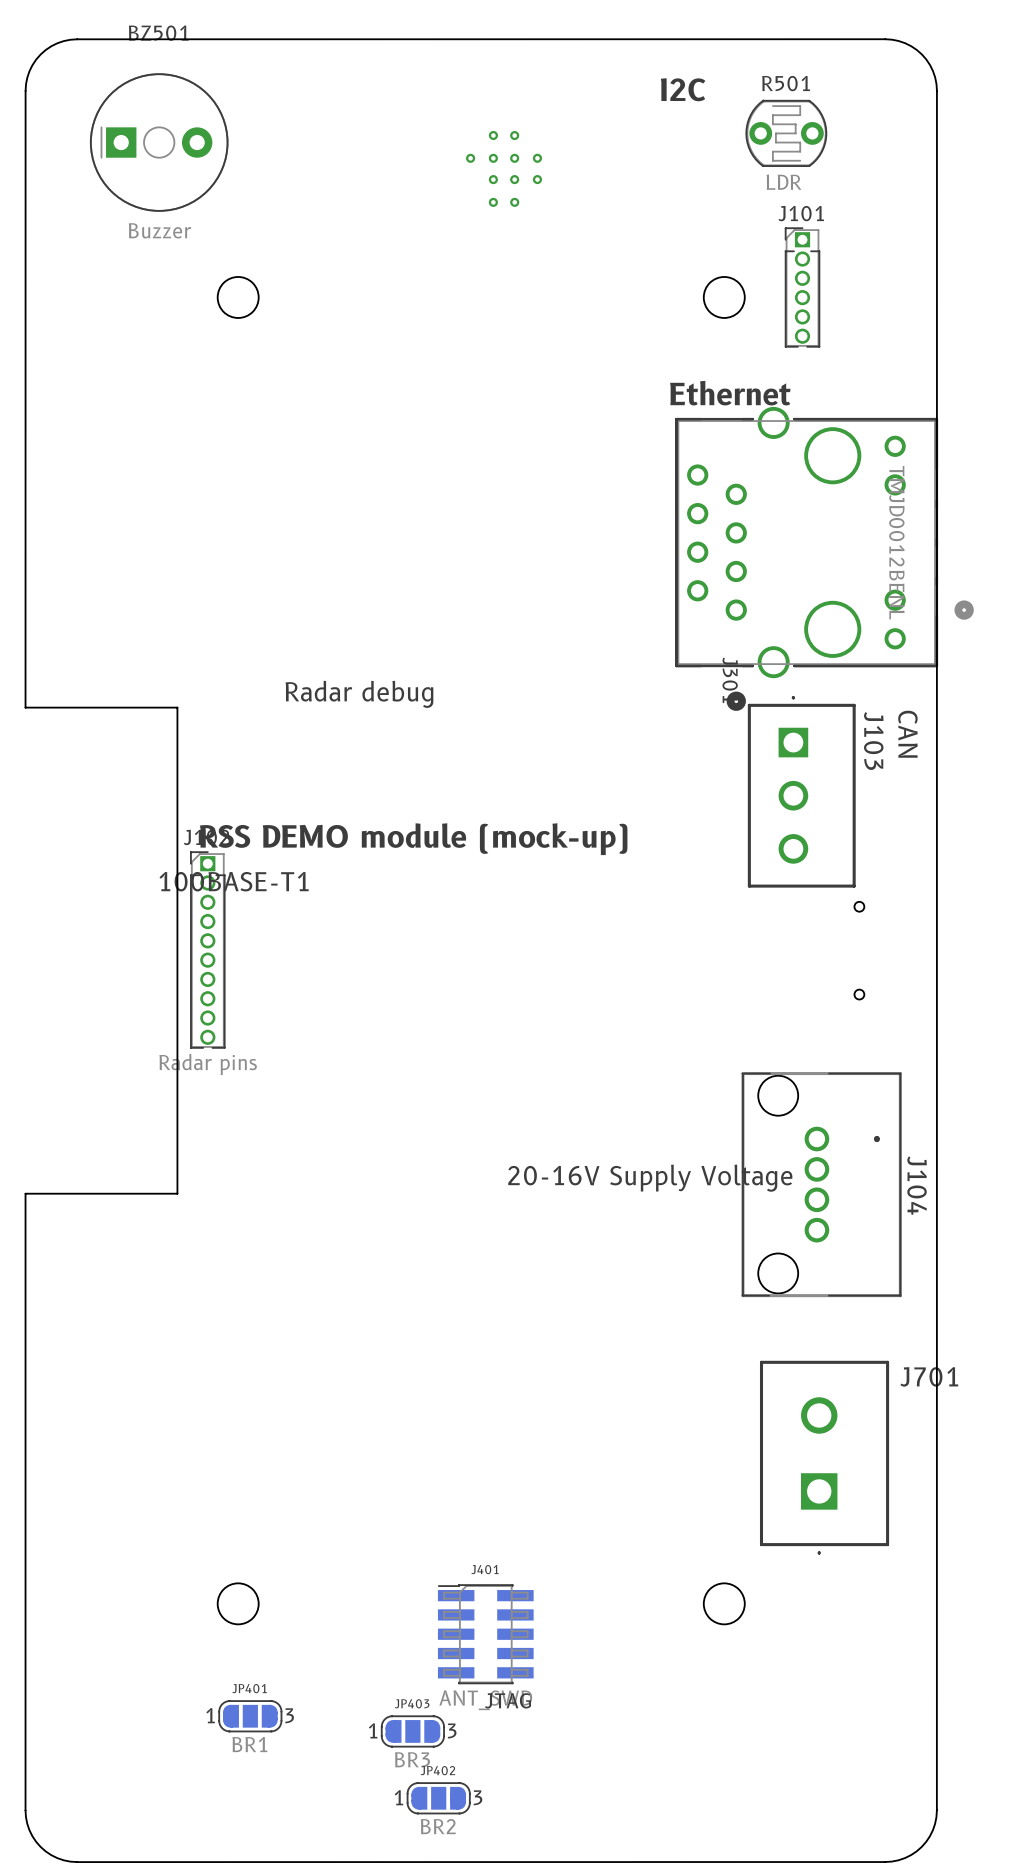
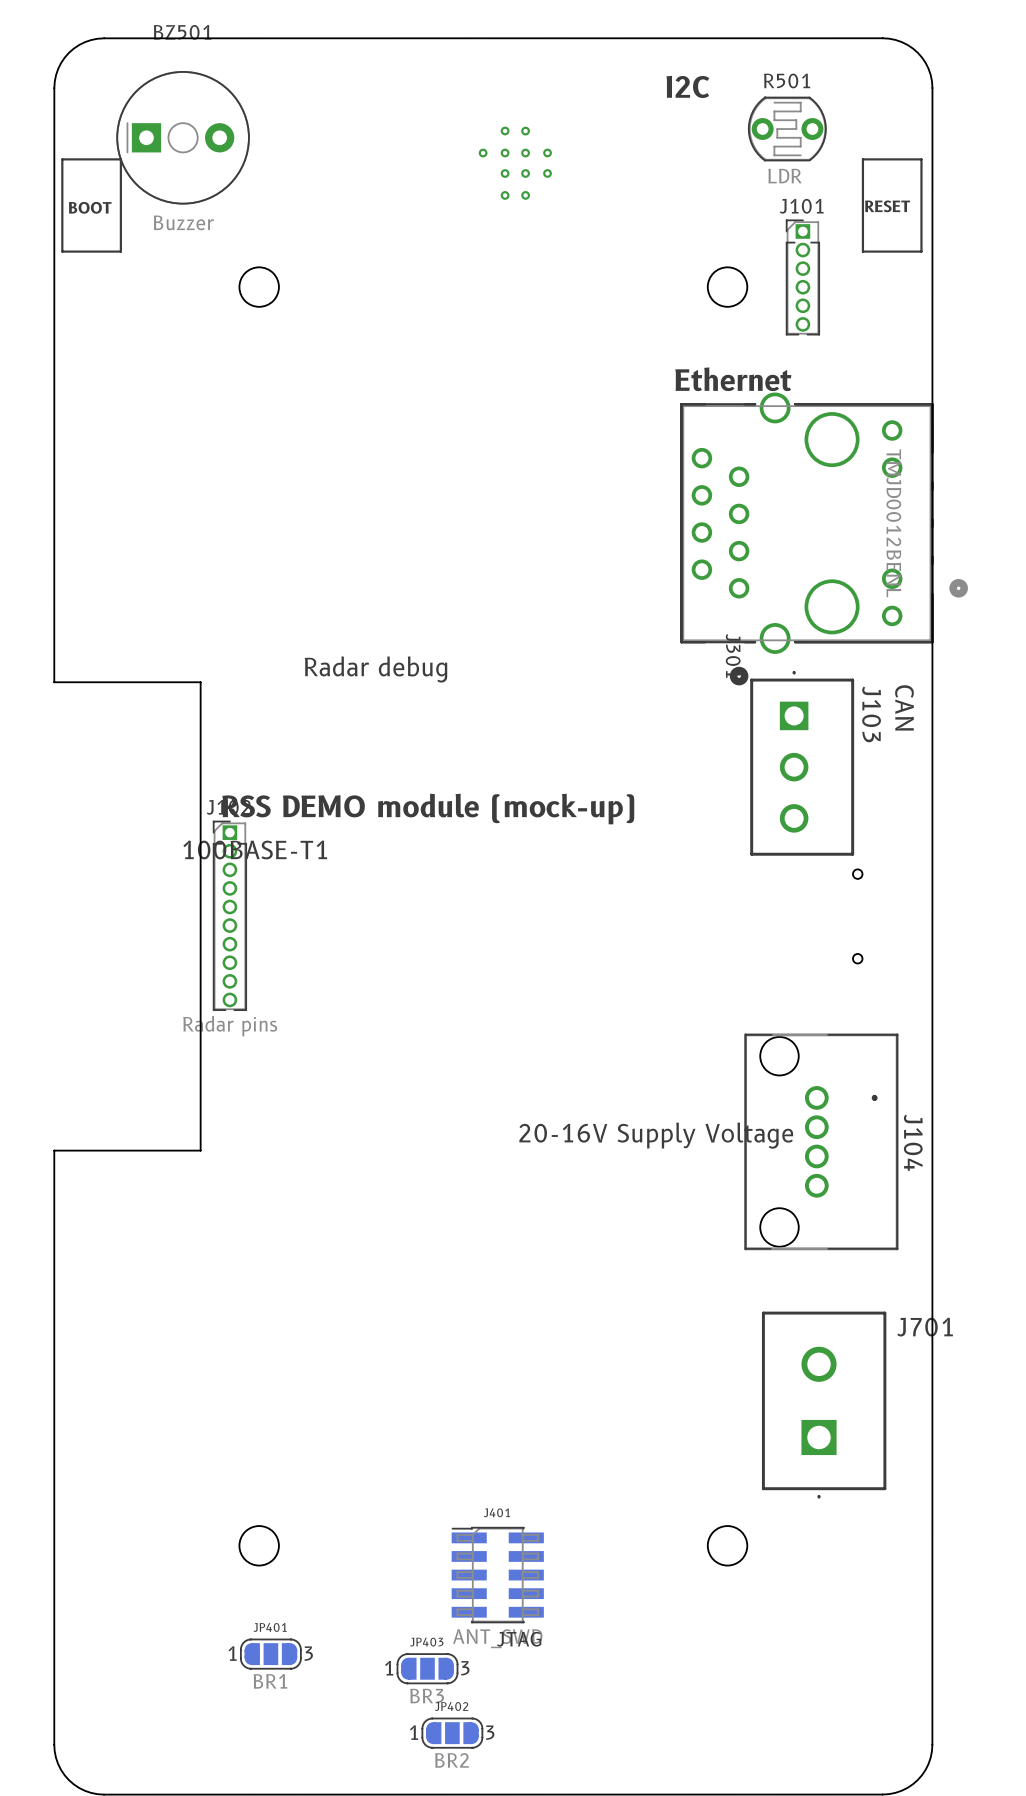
line: none -> (120, 159) (62, 159) (62, 251) (120, 251) (120, 159)
line: none -> (921, 159) (862, 159) (862, 251) (921, 251) (921, 159)
text: none -> RESET (887, 206)
text: none -> BOOT (90, 207)

